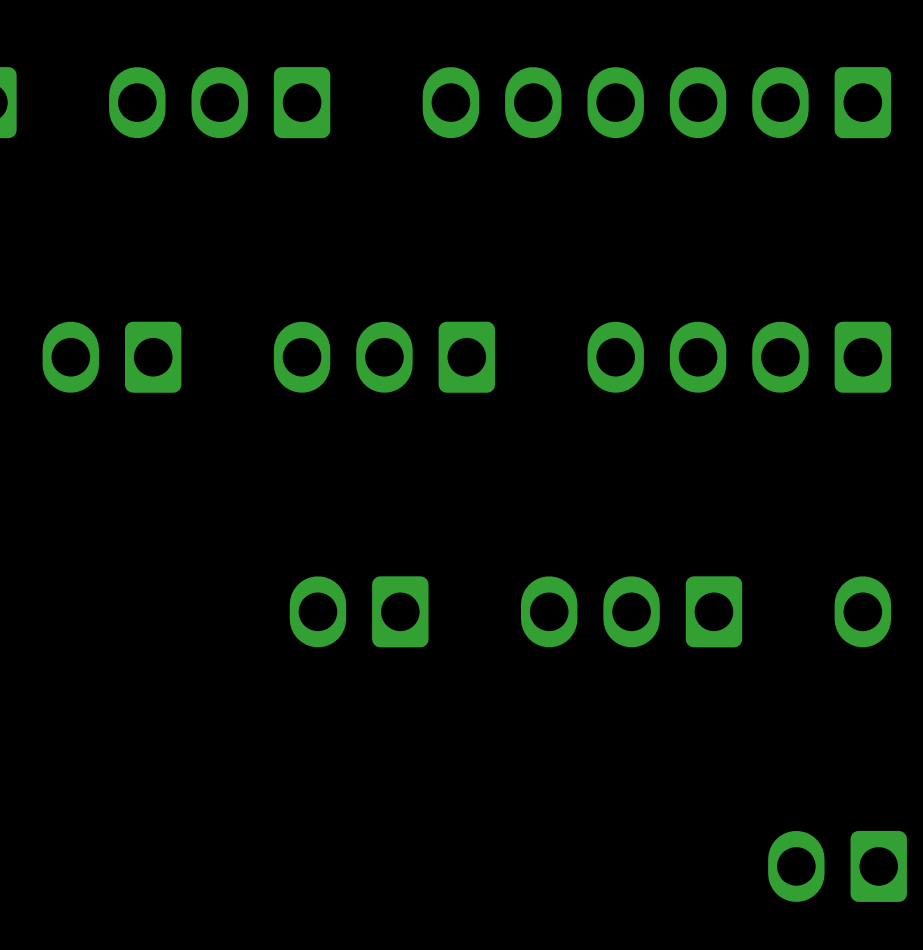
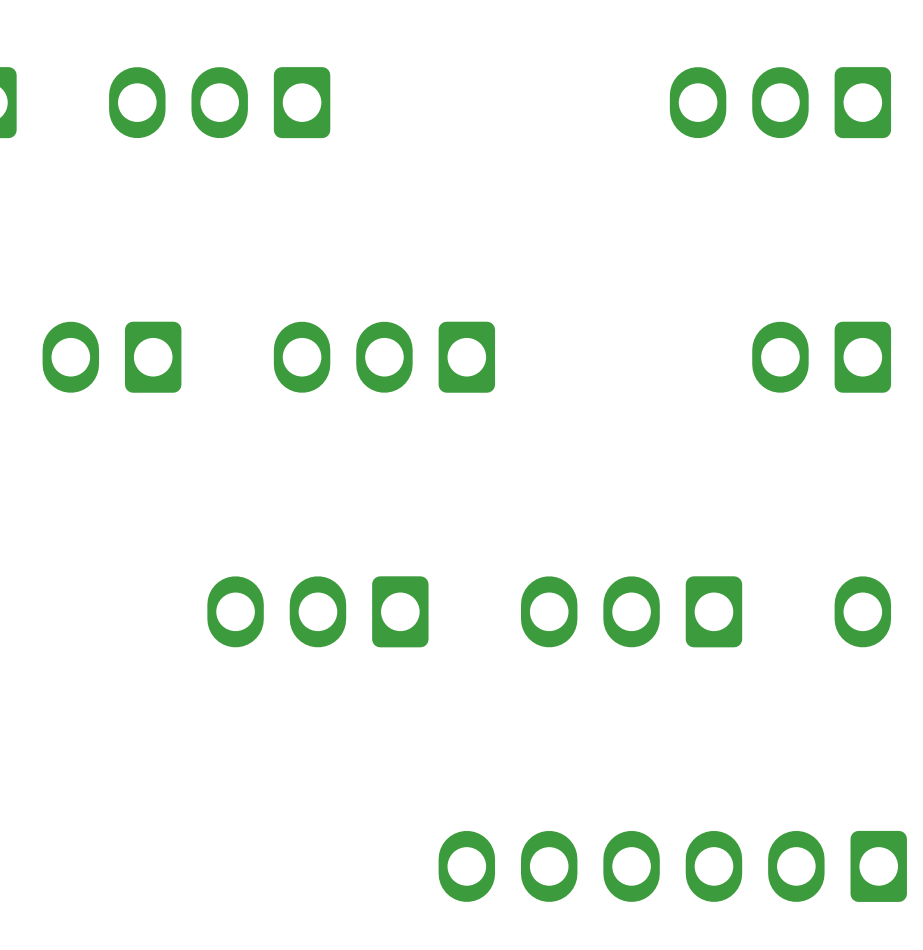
part position: (656, 102) -> (672, 866)
part: (739, 357) -> none
part: none -> (317, 611)

